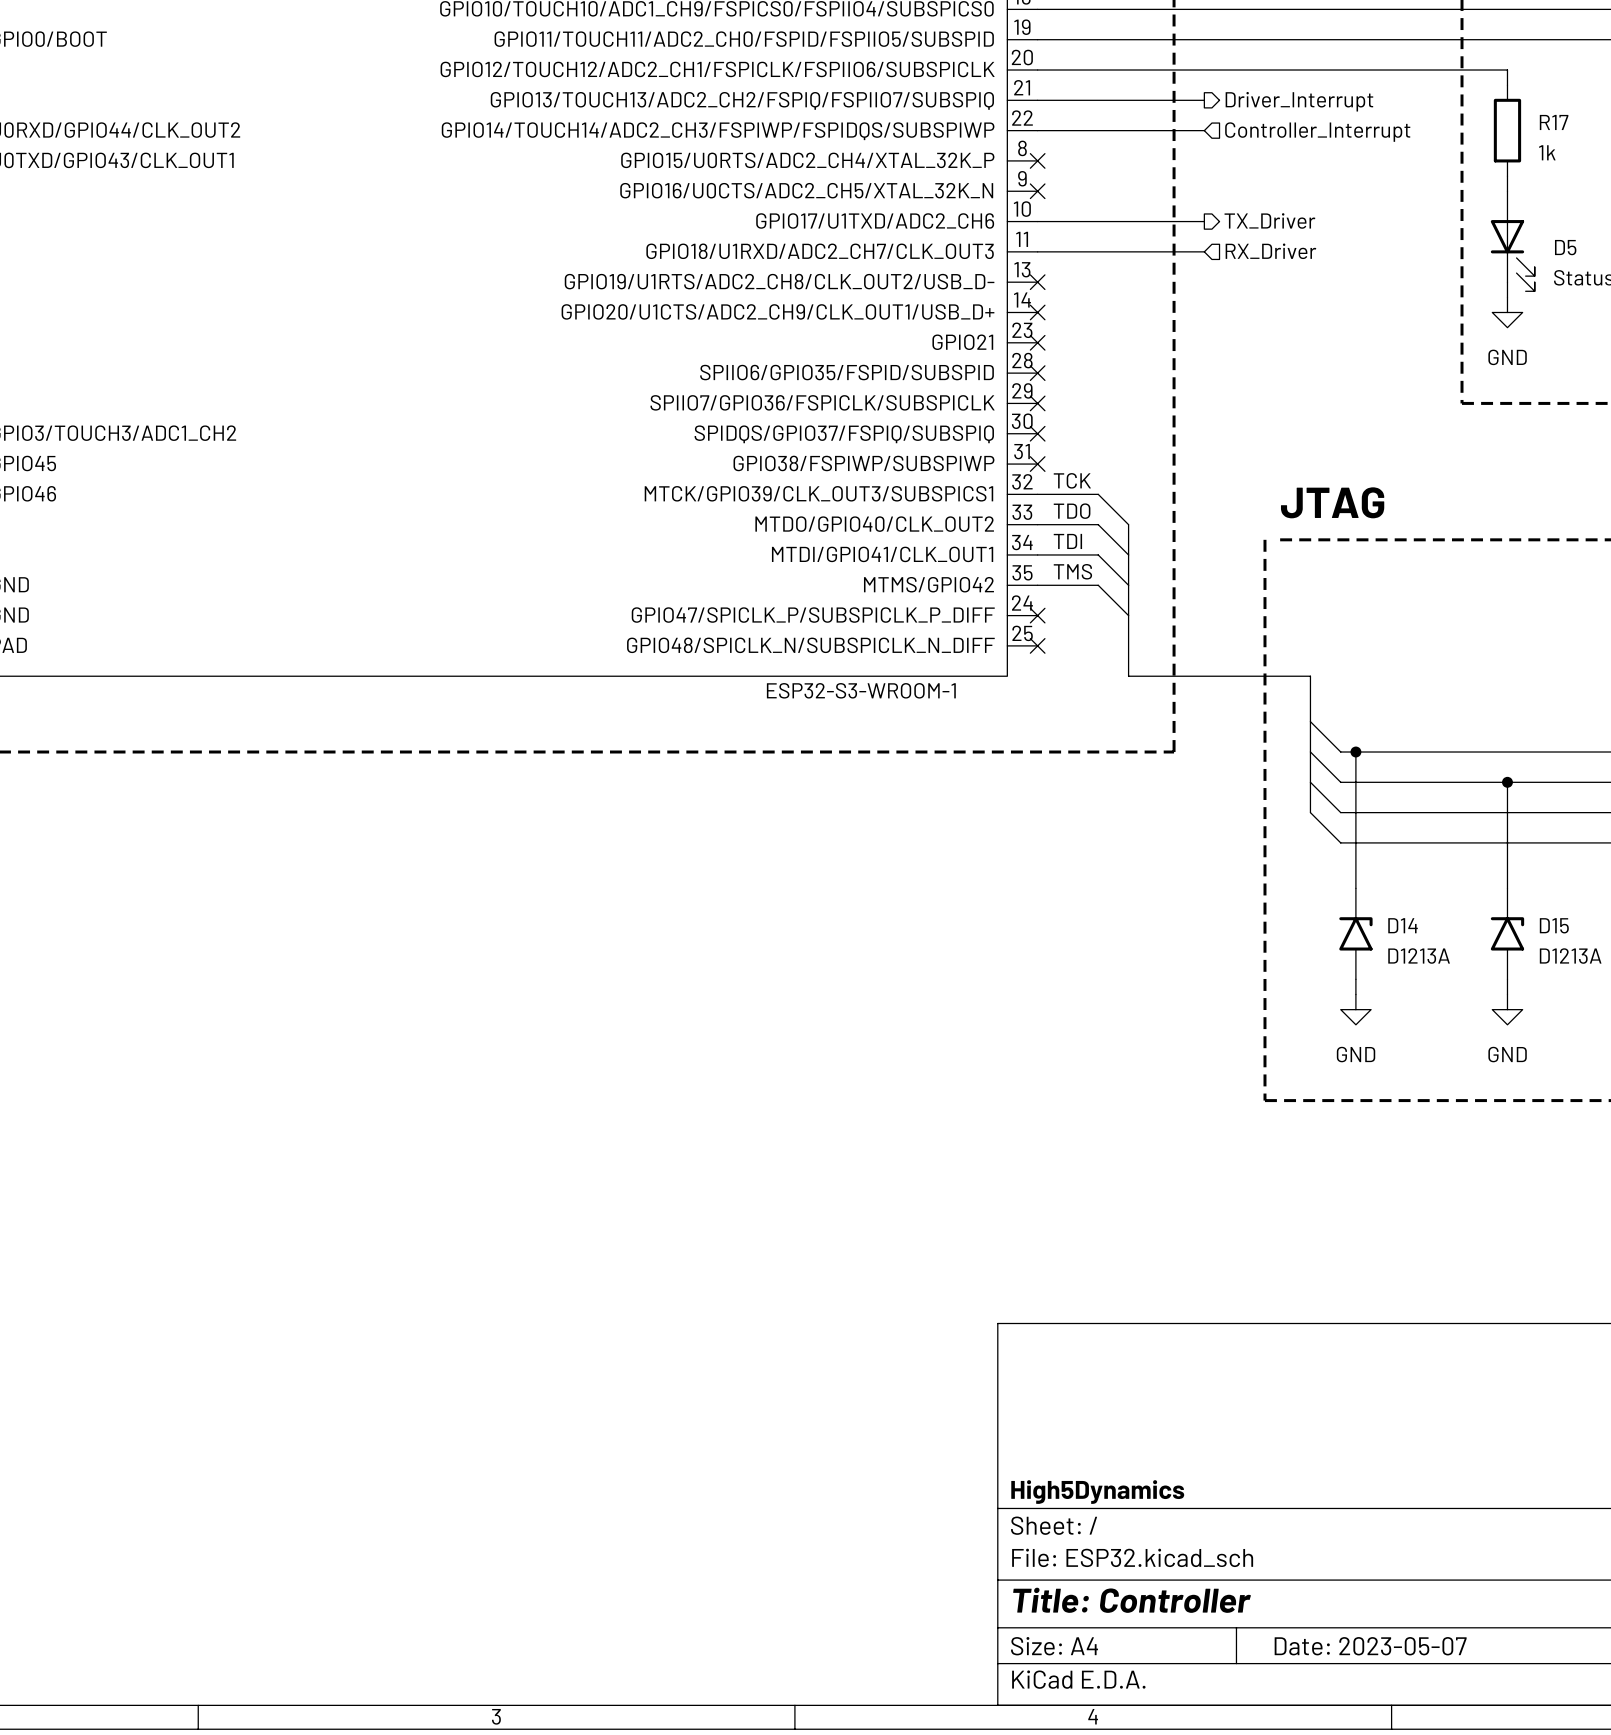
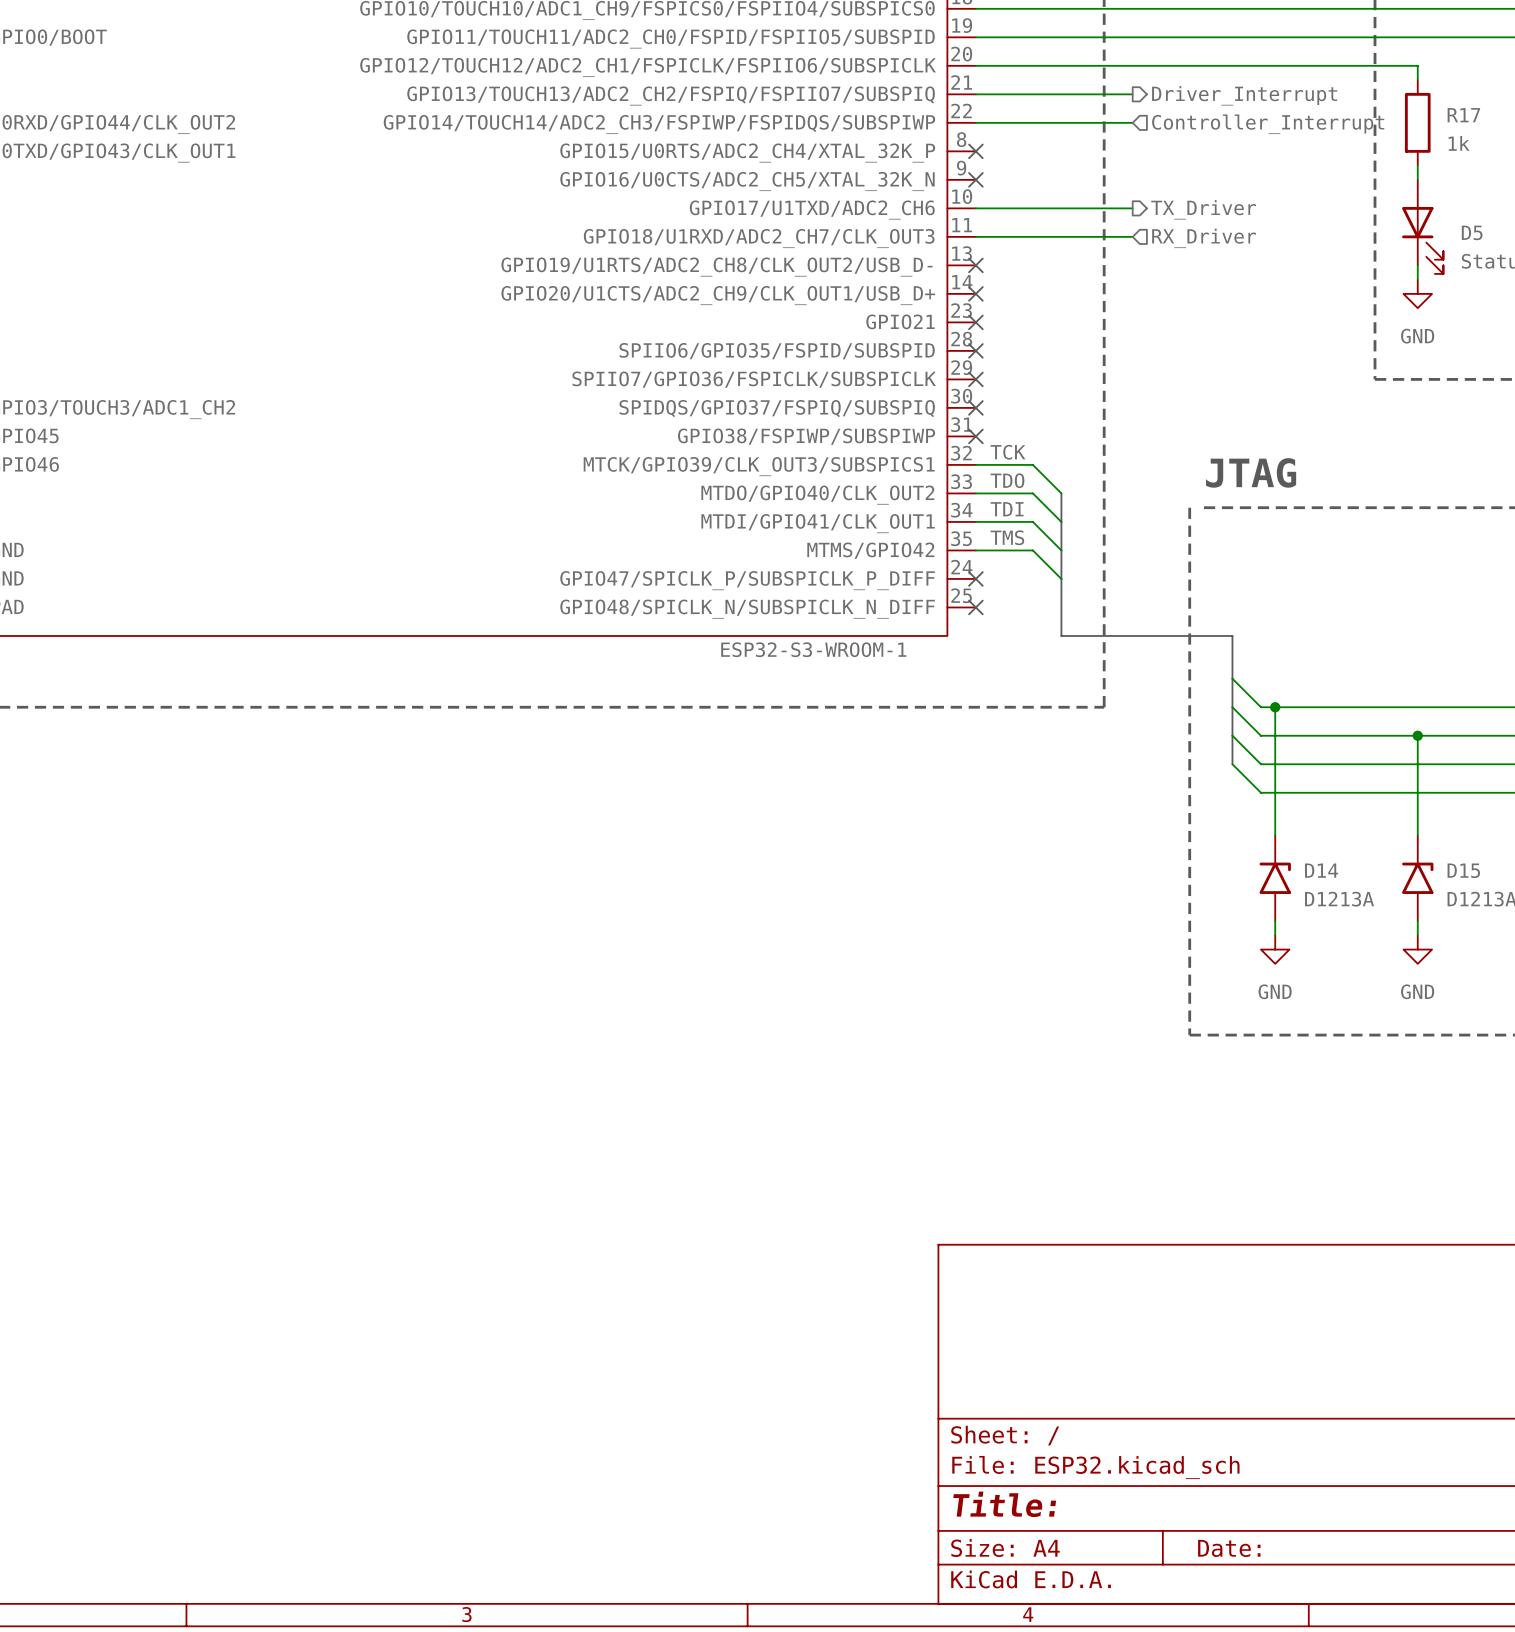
title block: High5Dynamics (1097, 1492) -> none
title block: Title: Controller (1132, 1600) -> Title: (1004, 1504)
title block: Date: 2023-05-07 (1370, 1646) -> Date: (1229, 1548)

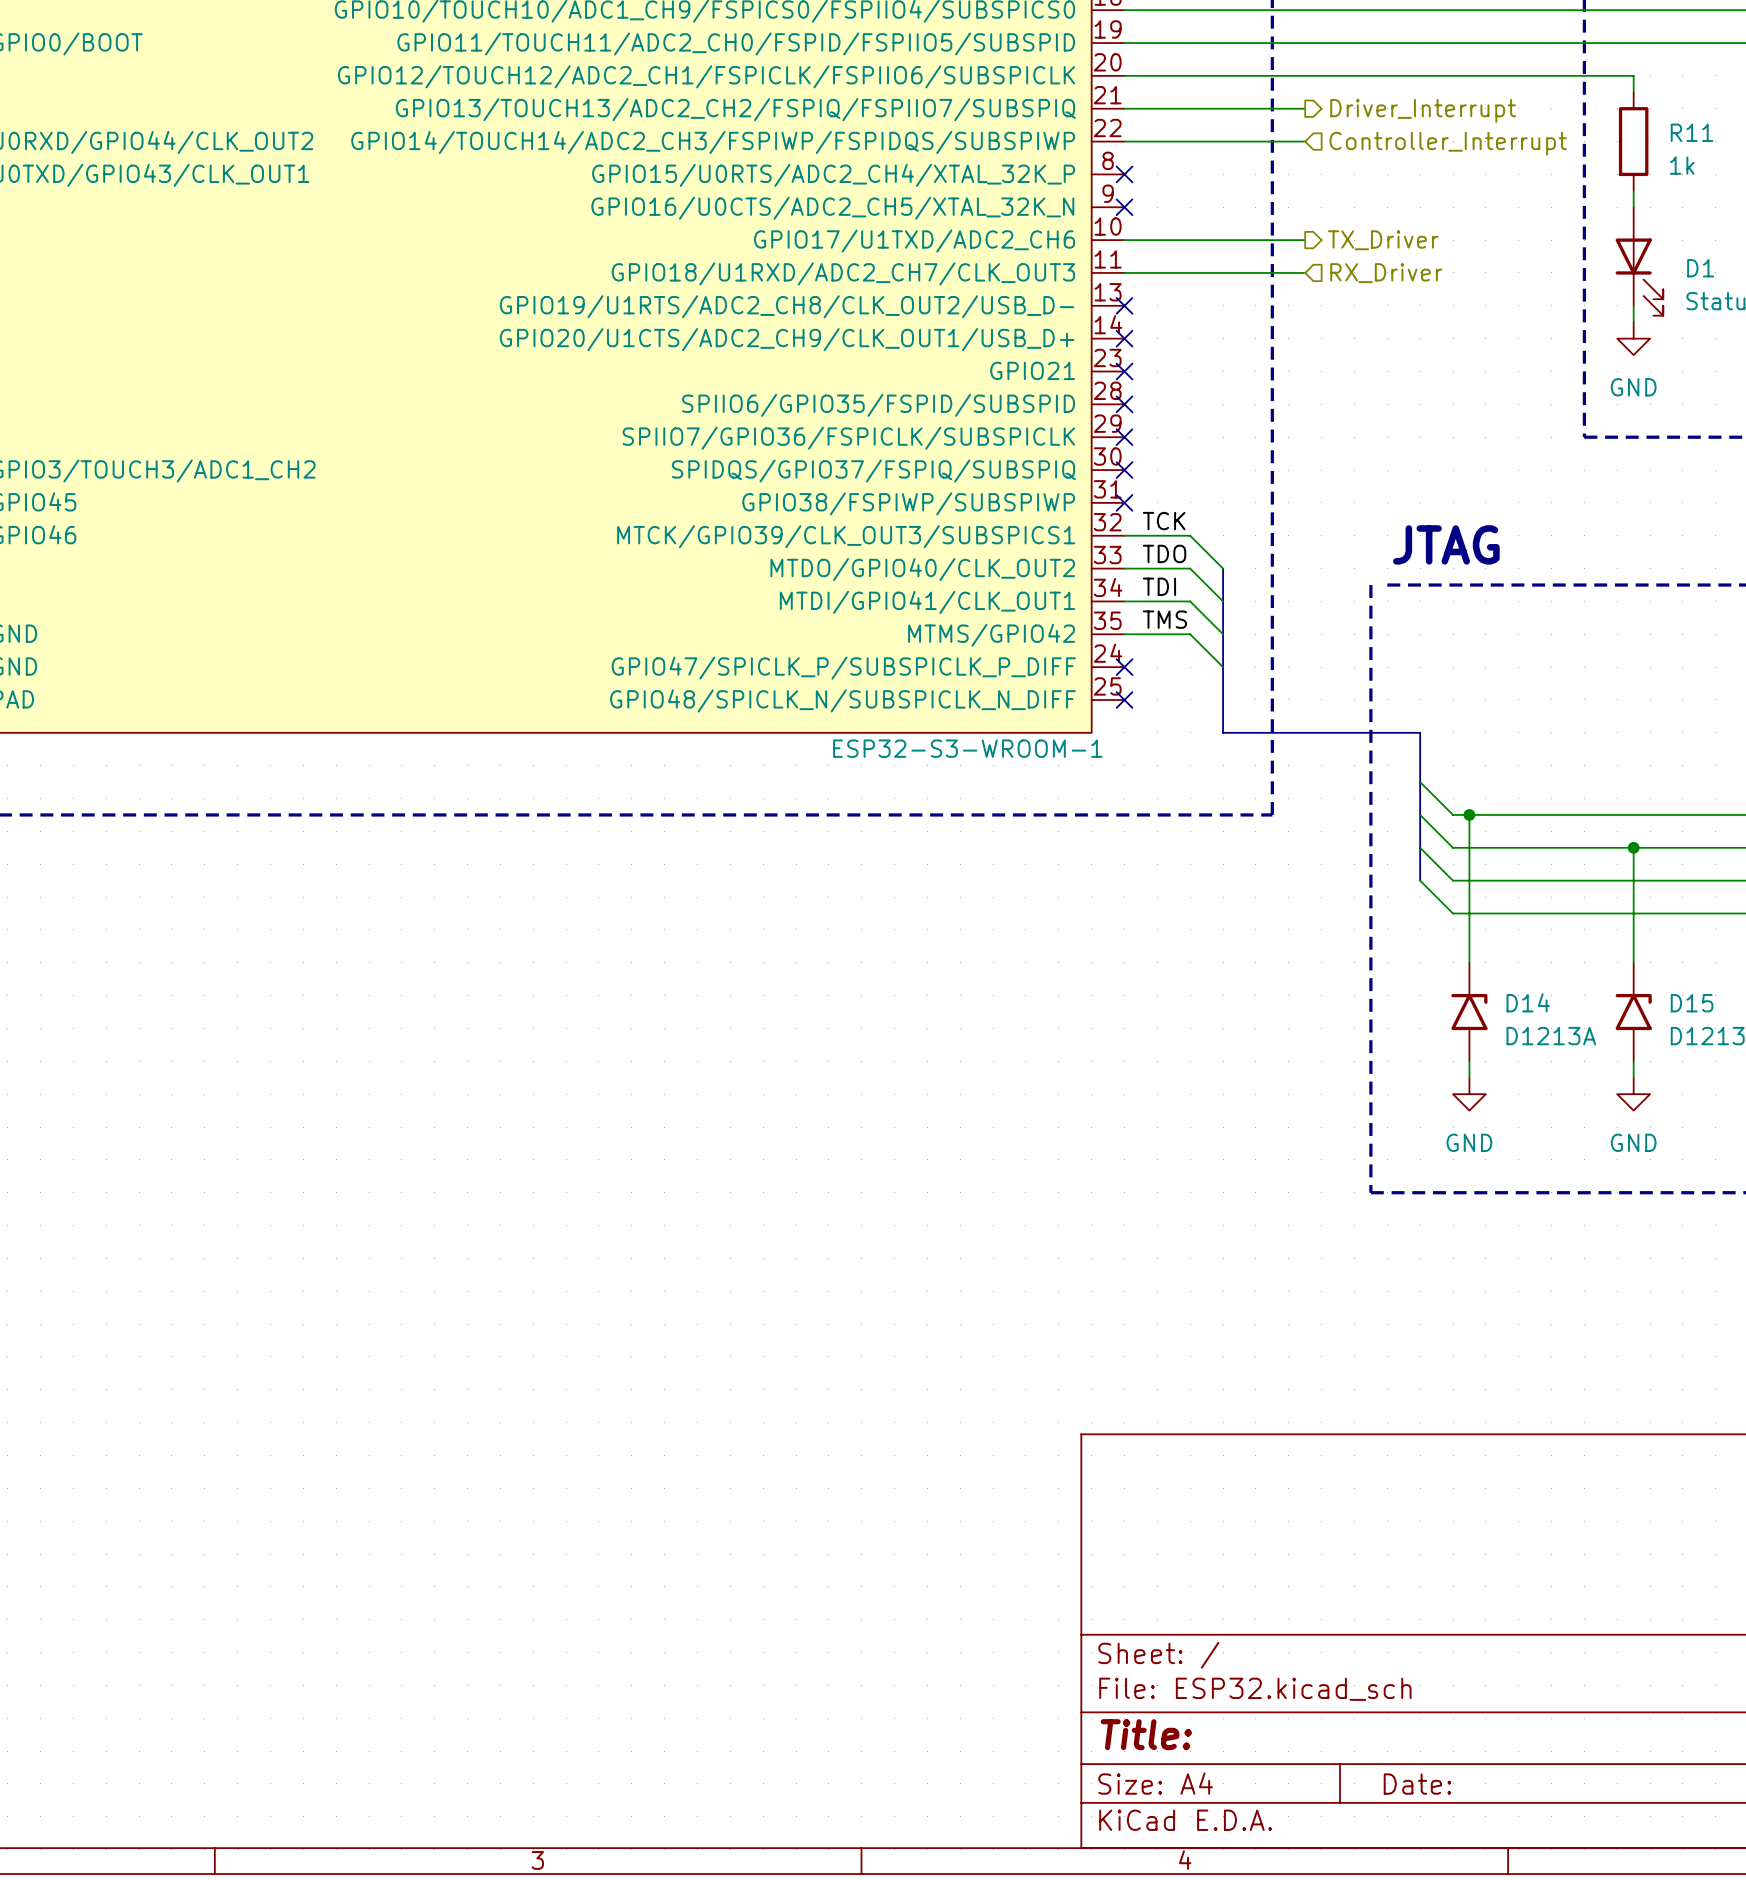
R17 name: R17 (1463, 115) -> R11 (1692, 132)
D5 name: D5 (1472, 232) -> D1 (1700, 268)

